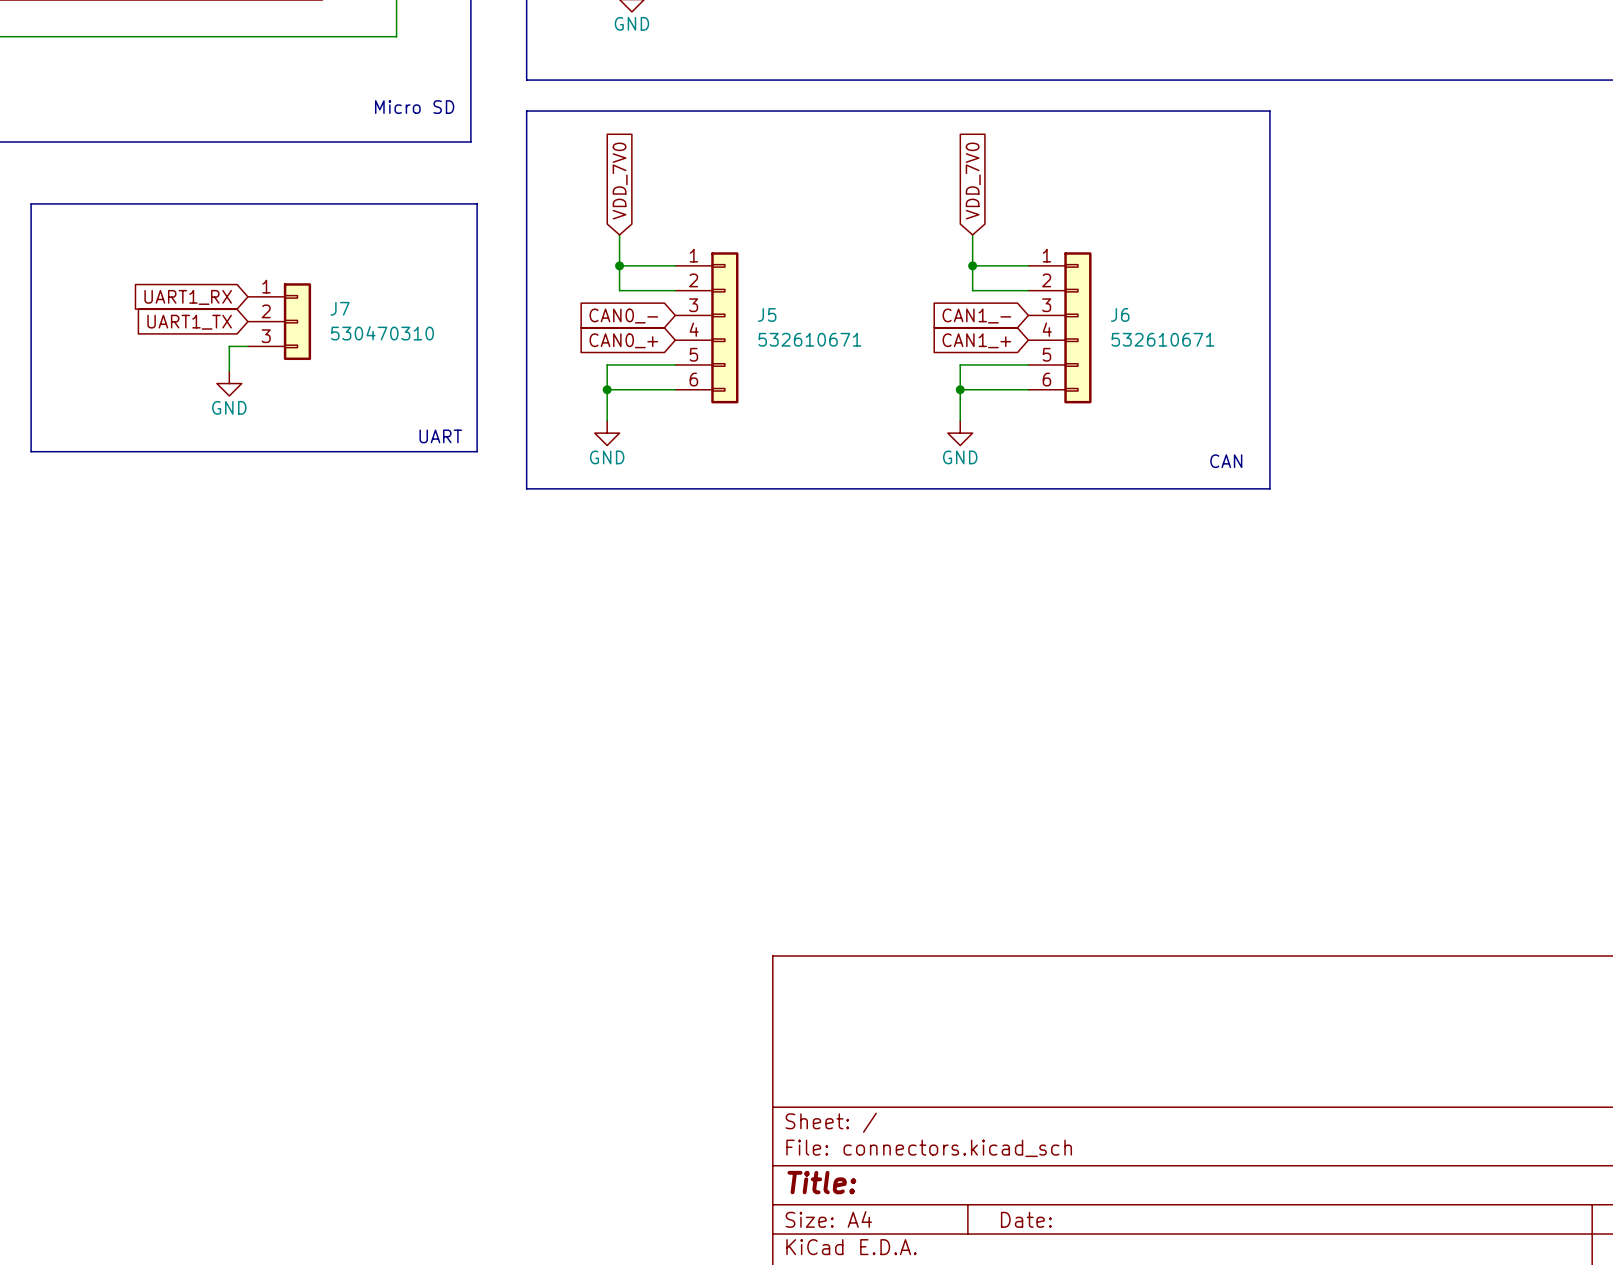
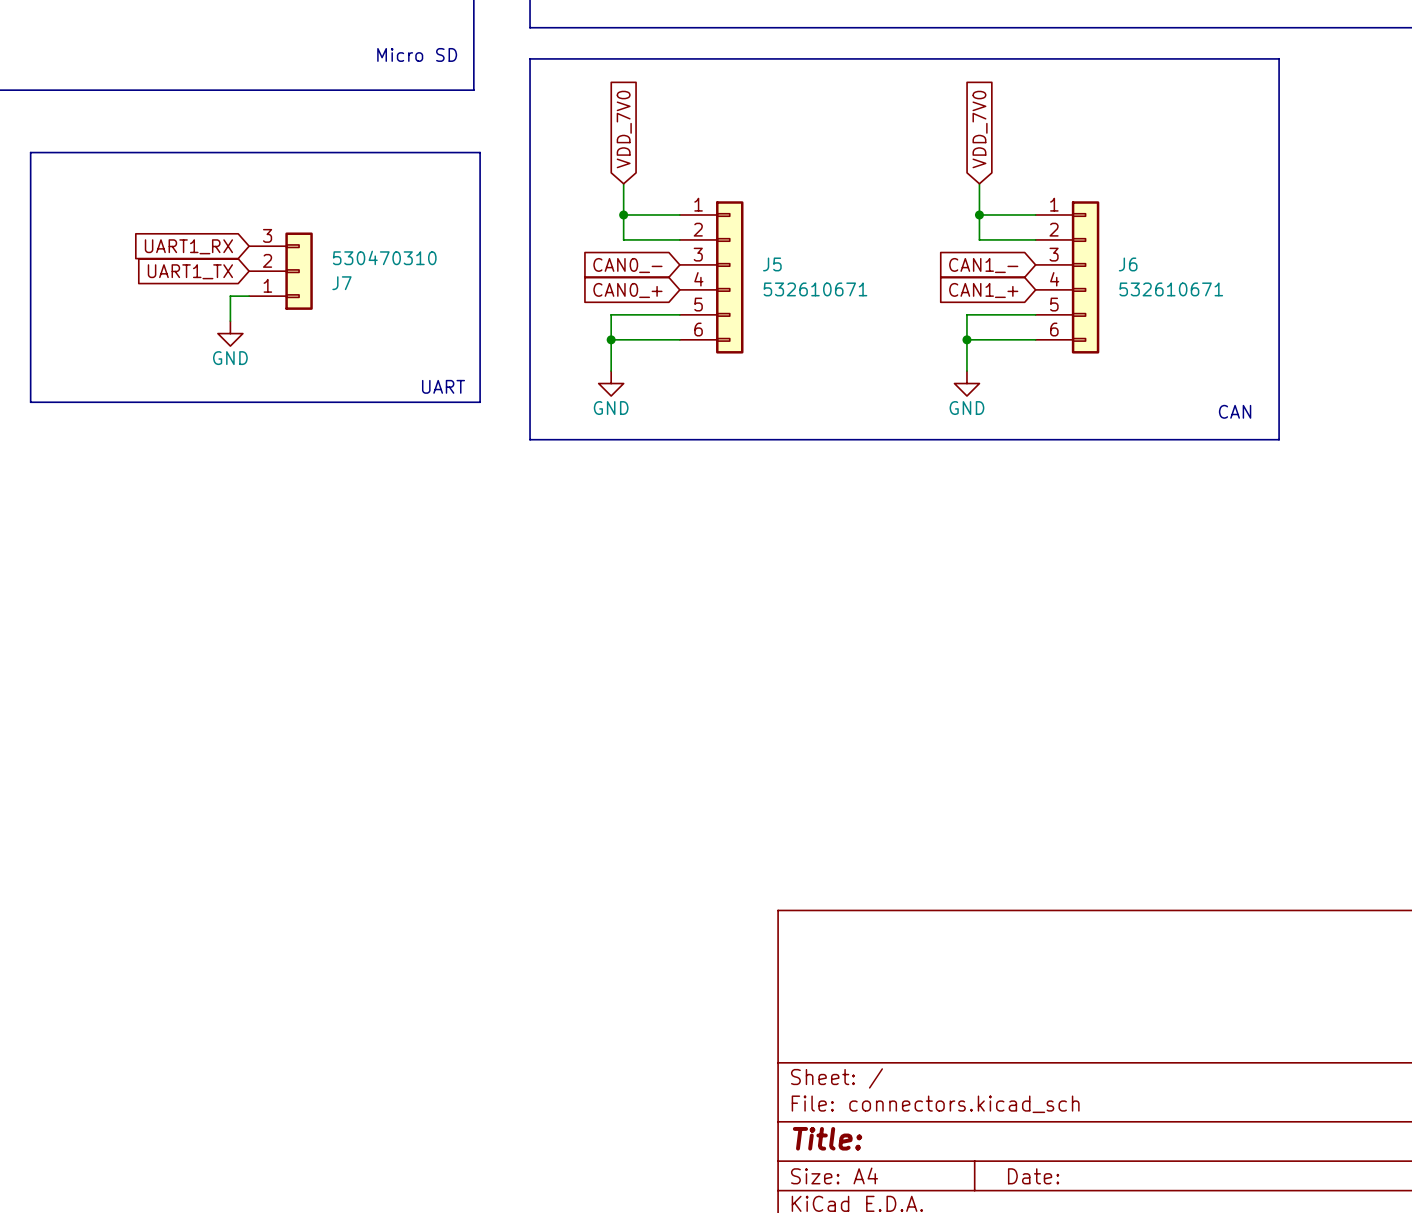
J7 flip: as is (297, 321) -> up-down (299, 271)

